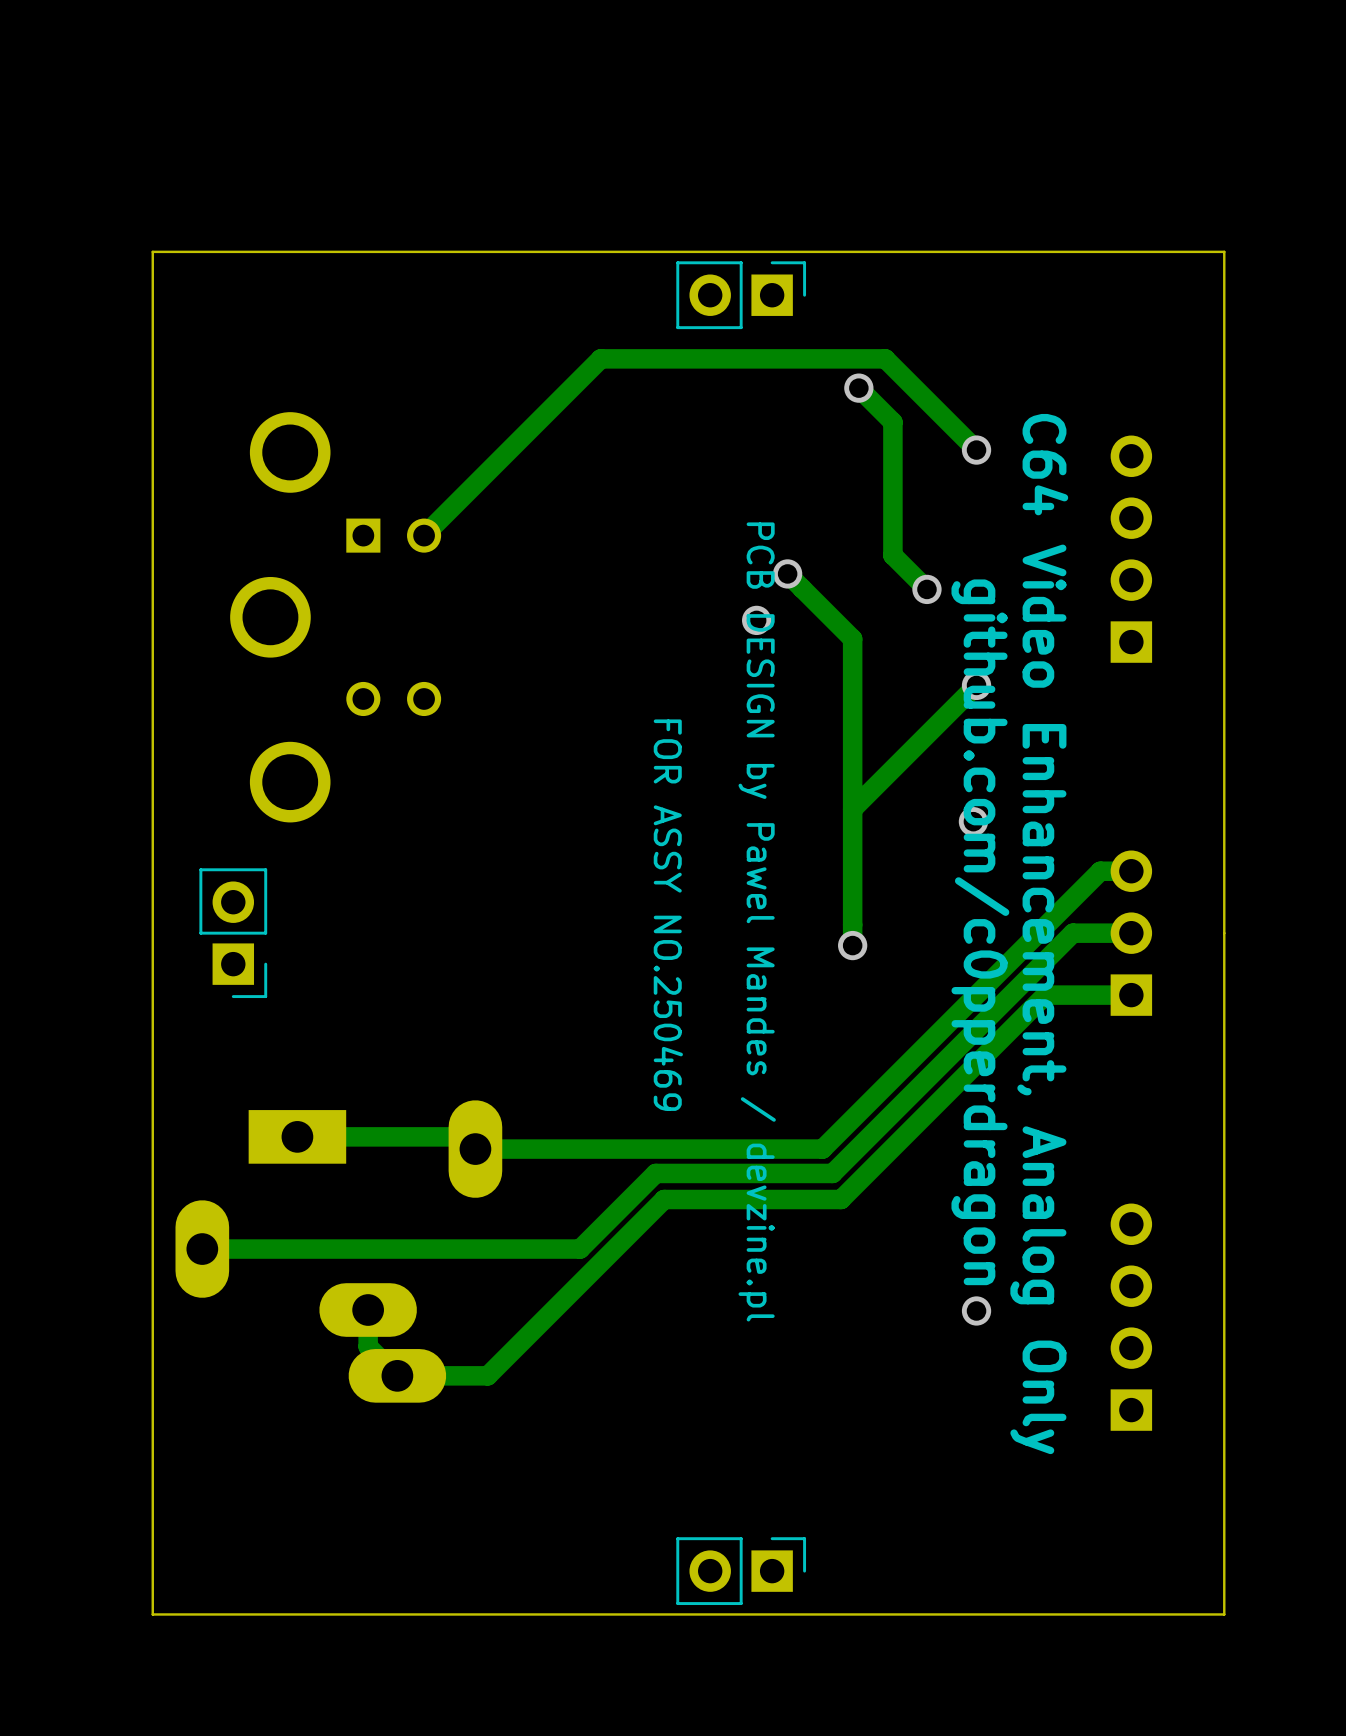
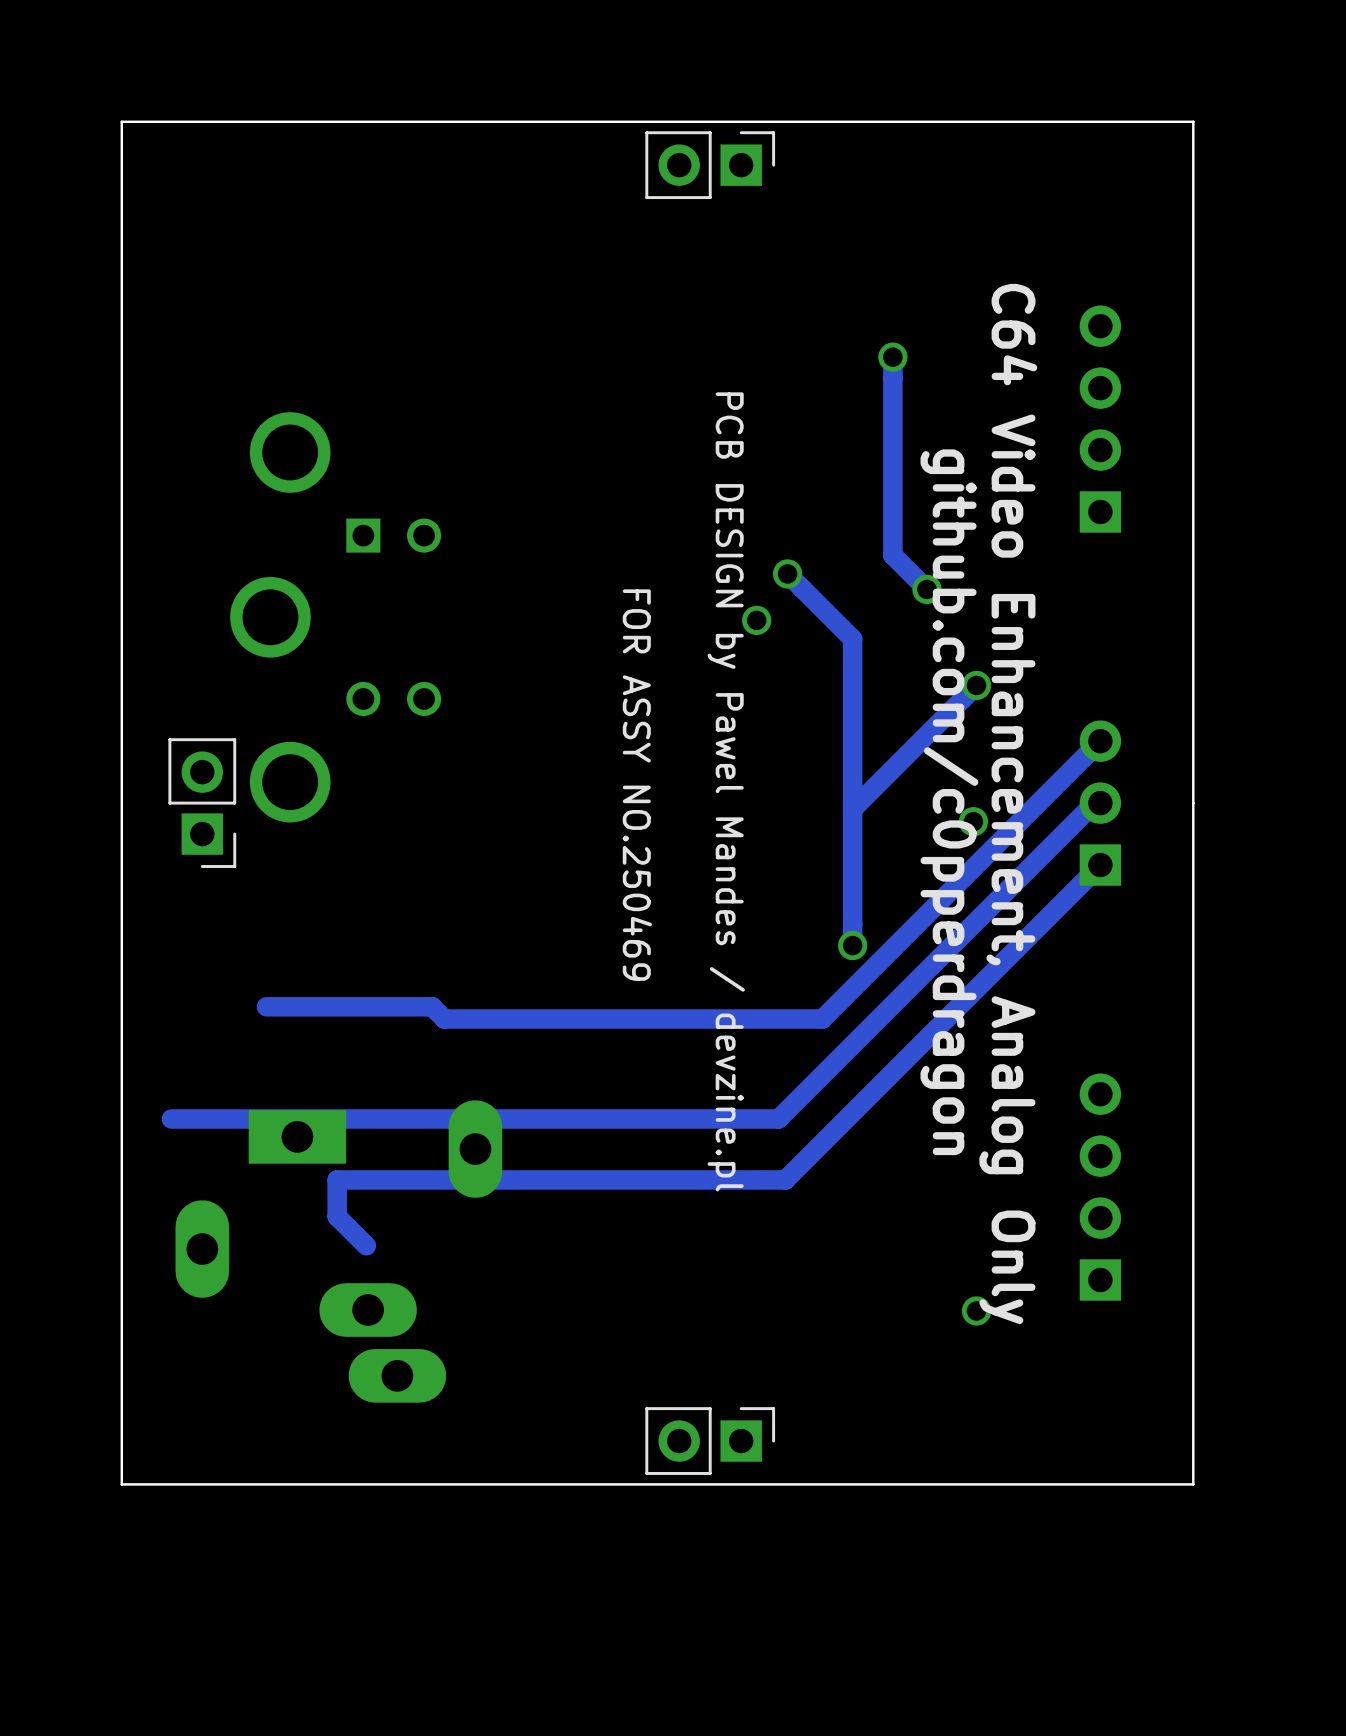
board edge: (1224, 251) (152, 251) (152, 1614) (1224, 1614) (1224, 251) -> (1193, 121) (121, 121) (121, 1484) (1193, 1484) (1193, 121)
part position: (741, 295) -> (710, 165)
track: (858, 388) (892, 422) -> (892, 357) (892, 422)
via position: (858, 388) -> (892, 357)
track: (976, 450) (885, 358) (600, 358) (424, 535) -> none
via: (976, 450) -> none
part position: (1131, 549) -> (1100, 419)
track: none -> (1100, 741) (822, 1019) (444, 1019) (432, 1006) (266, 1006)
track: none -> (1100, 803) (1094, 803) (778, 1118) (171, 1118)
track: none -> (1100, 865) (785, 1179) (337, 1179) (337, 1216) (366, 1245)
track: (1131, 871) (1100, 871) (822, 1149) (475, 1149) (463, 1136) (297, 1136) -> none
text position: FOR ASSY NO.250469 (668, 915) -> FOR ASSY NO.250469 (637, 785)
text position: PCB DESIGN by Pawel Mandes / devzine.pl (757, 921) -> PCB DESIGN by Pawel Mandes / devzine.pl (726, 791)
text position: github.com/c0pperdragon (980, 932) -> github.com/c0pperdragon (949, 802)
part position: (233, 933) -> (202, 803)
track: (1131, 933) (1072, 933) (832, 1173) (655, 1173) (580, 1249) (202, 1249) -> none
part position: (1131, 933) -> (1100, 803)
text position: C64 Video Enhancement, Analog Only (1039, 934) -> C64 Video Enhancement, Analog Only (1008, 803)
track: (1131, 995) (1045, 995) (841, 1199) (664, 1199) (487, 1375) (397, 1375) (368, 1346) (368, 1310) -> none
part position: (1131, 1317) -> (1100, 1187)
part position: (741, 1571) -> (710, 1441)

